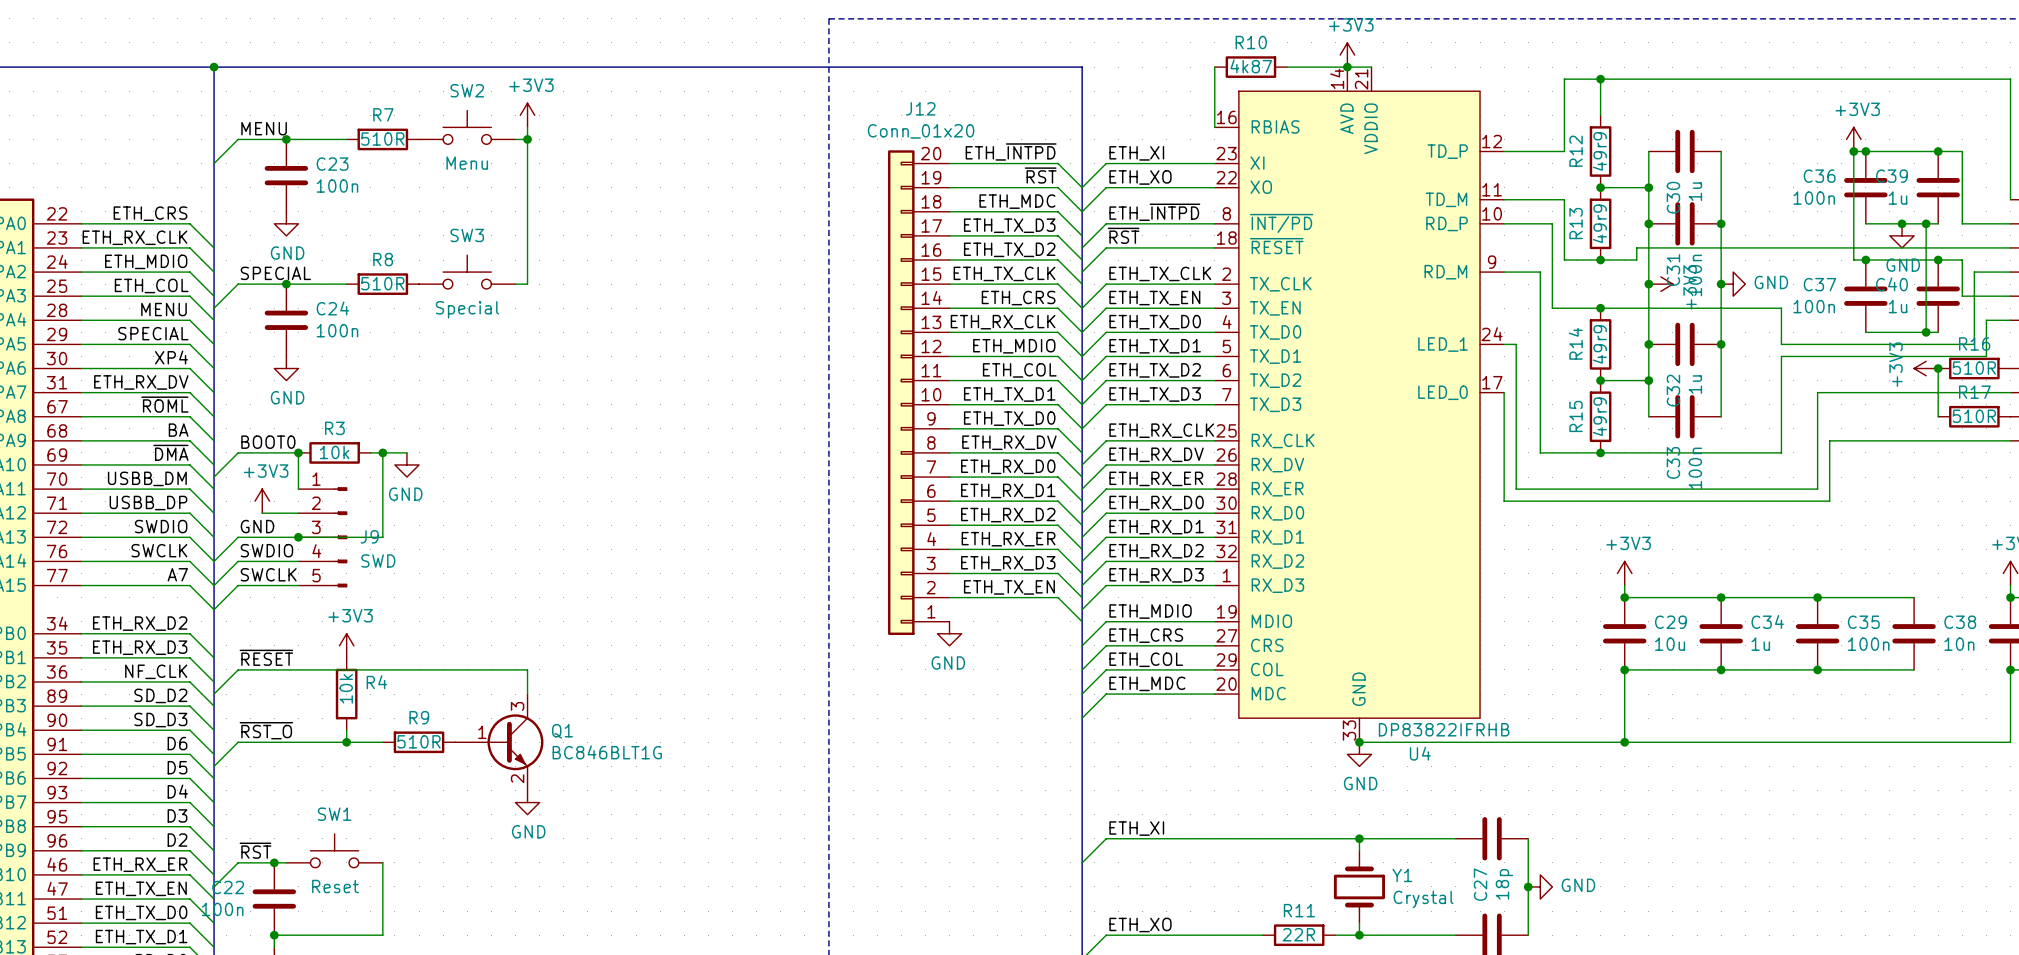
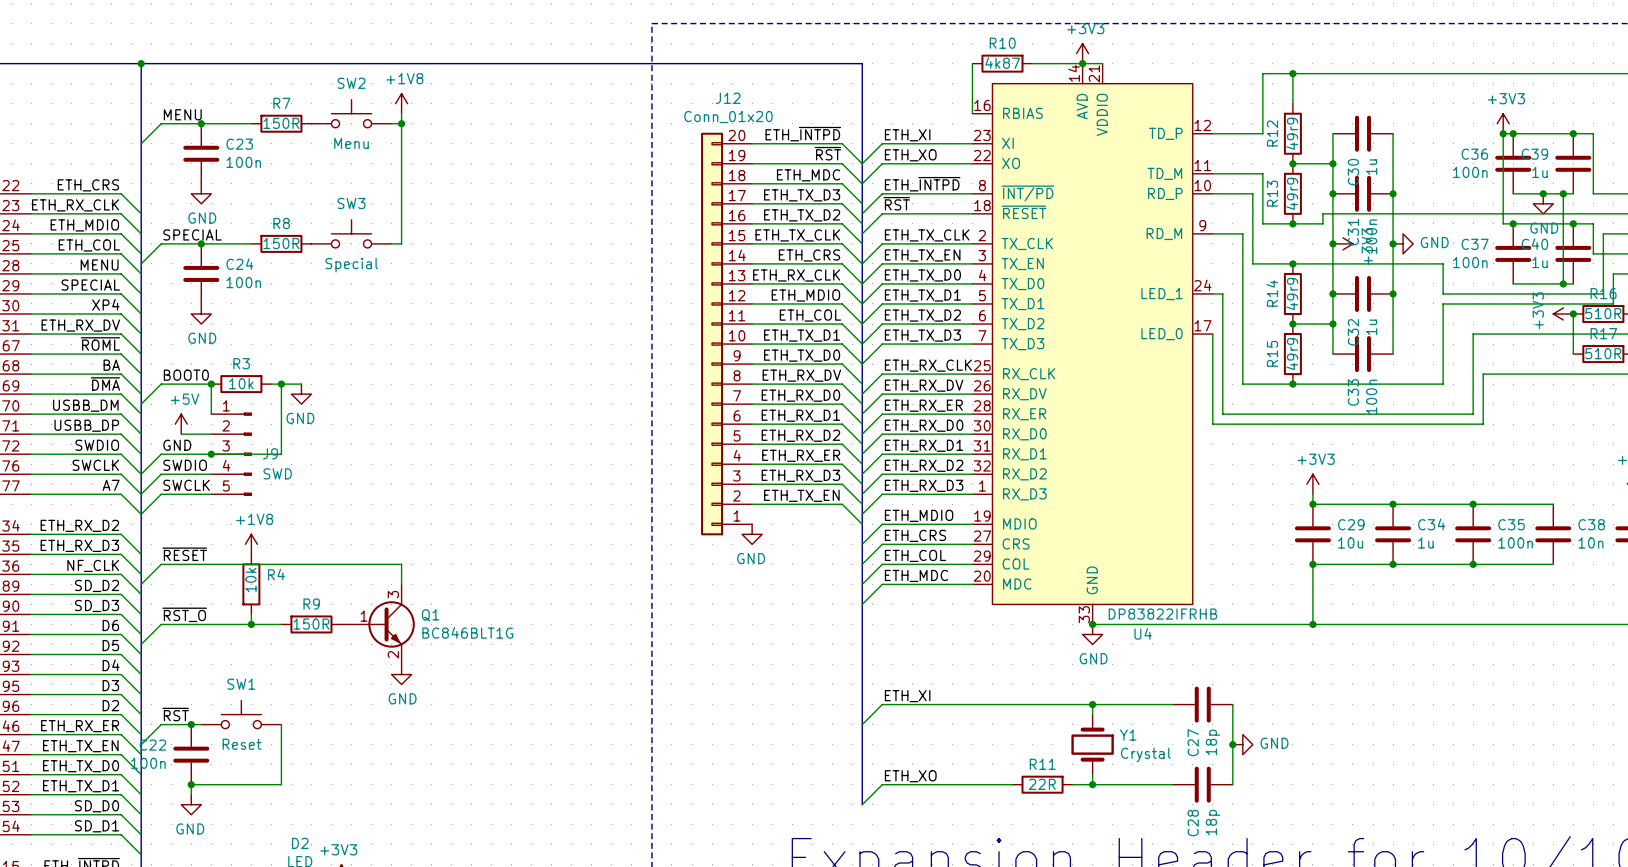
power symbol: +3V3 (527, 115) -> +1V8 (401, 103)
R7 value: 510R (382, 138) -> 150R (281, 123)
R8 value: 510R (382, 283) -> 150R (281, 243)
power symbol: +3V3 (262, 501) -> +5V (181, 424)
power symbol: +3V3 (346, 645) -> +1V8 (251, 544)
R9 value: 510R (419, 741) -> 150R (311, 624)

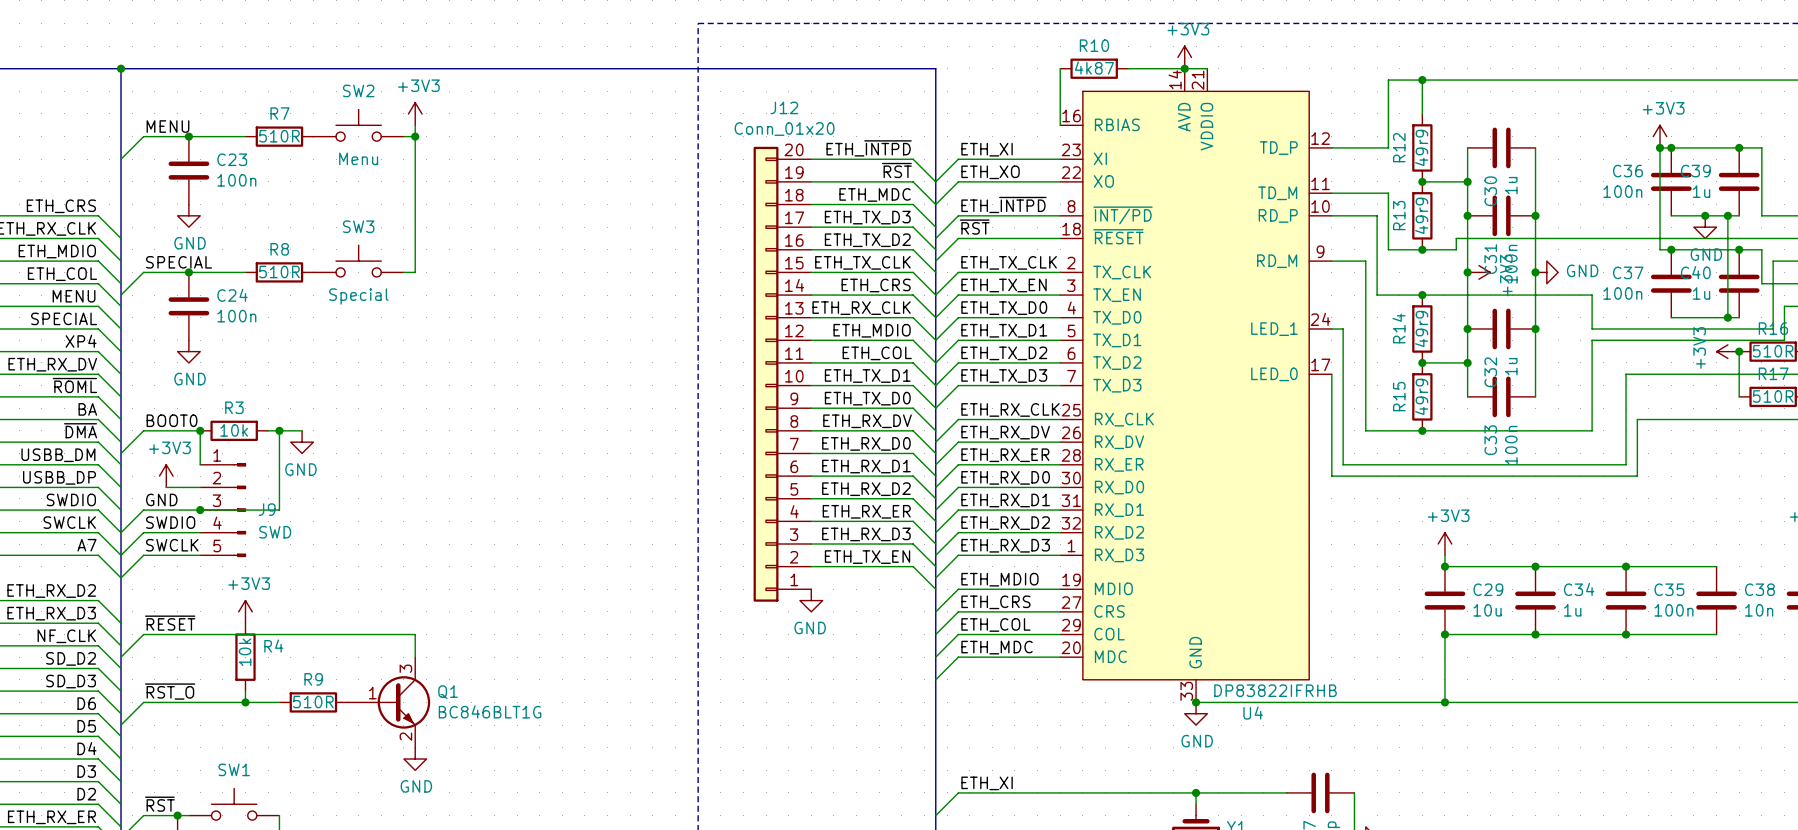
power symbol: +1V8 (401, 103) -> +3V3 (415, 113)
R7 value: 150R (281, 123) -> 510R (279, 136)
R8 value: 150R (281, 243) -> 510R (279, 271)
power symbol: +5V (181, 424) -> +3V3 (166, 476)
power symbol: +1V8 (251, 544) -> +3V3 (245, 611)
R9 value: 150R (311, 624) -> 510R (313, 702)

